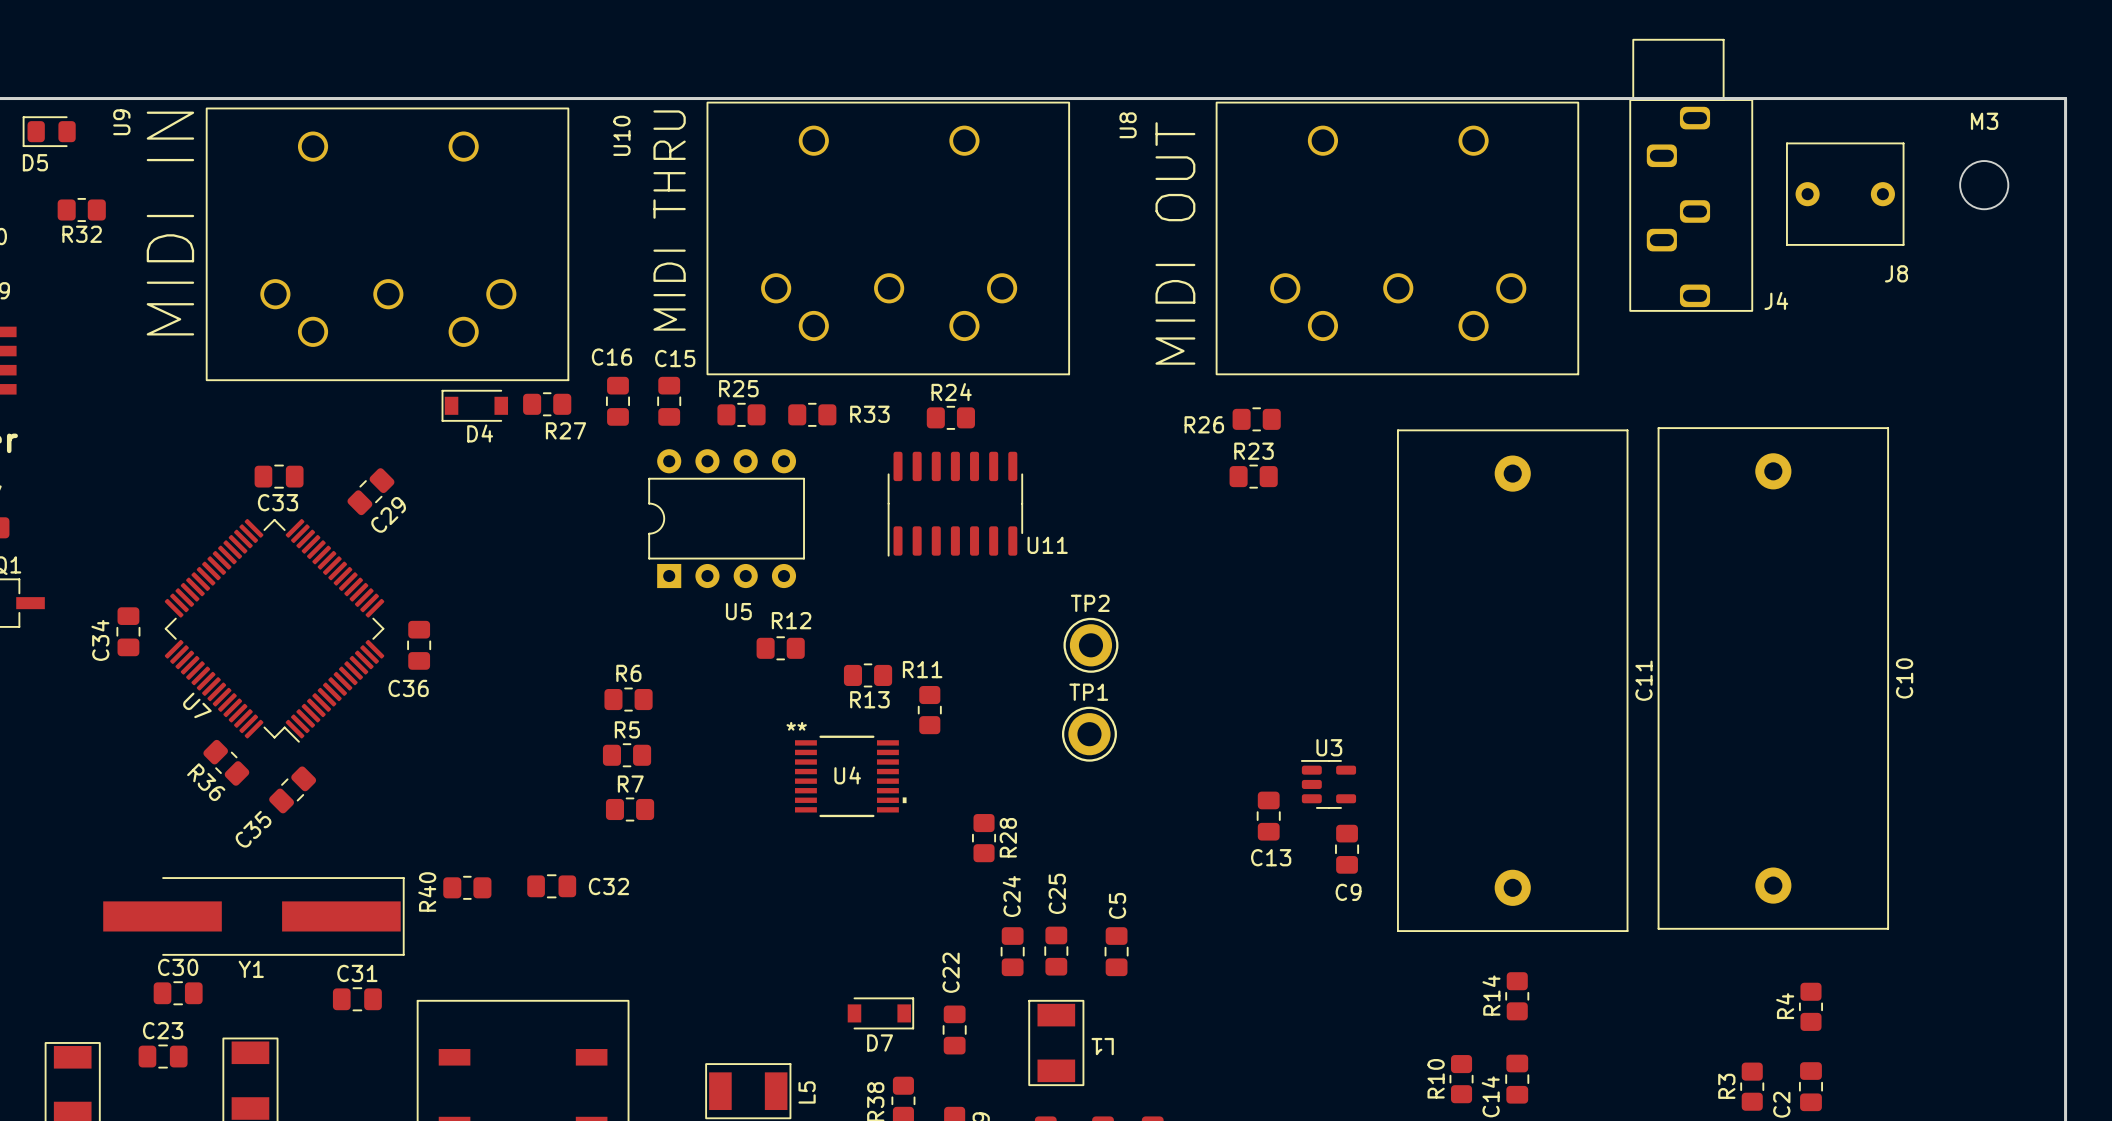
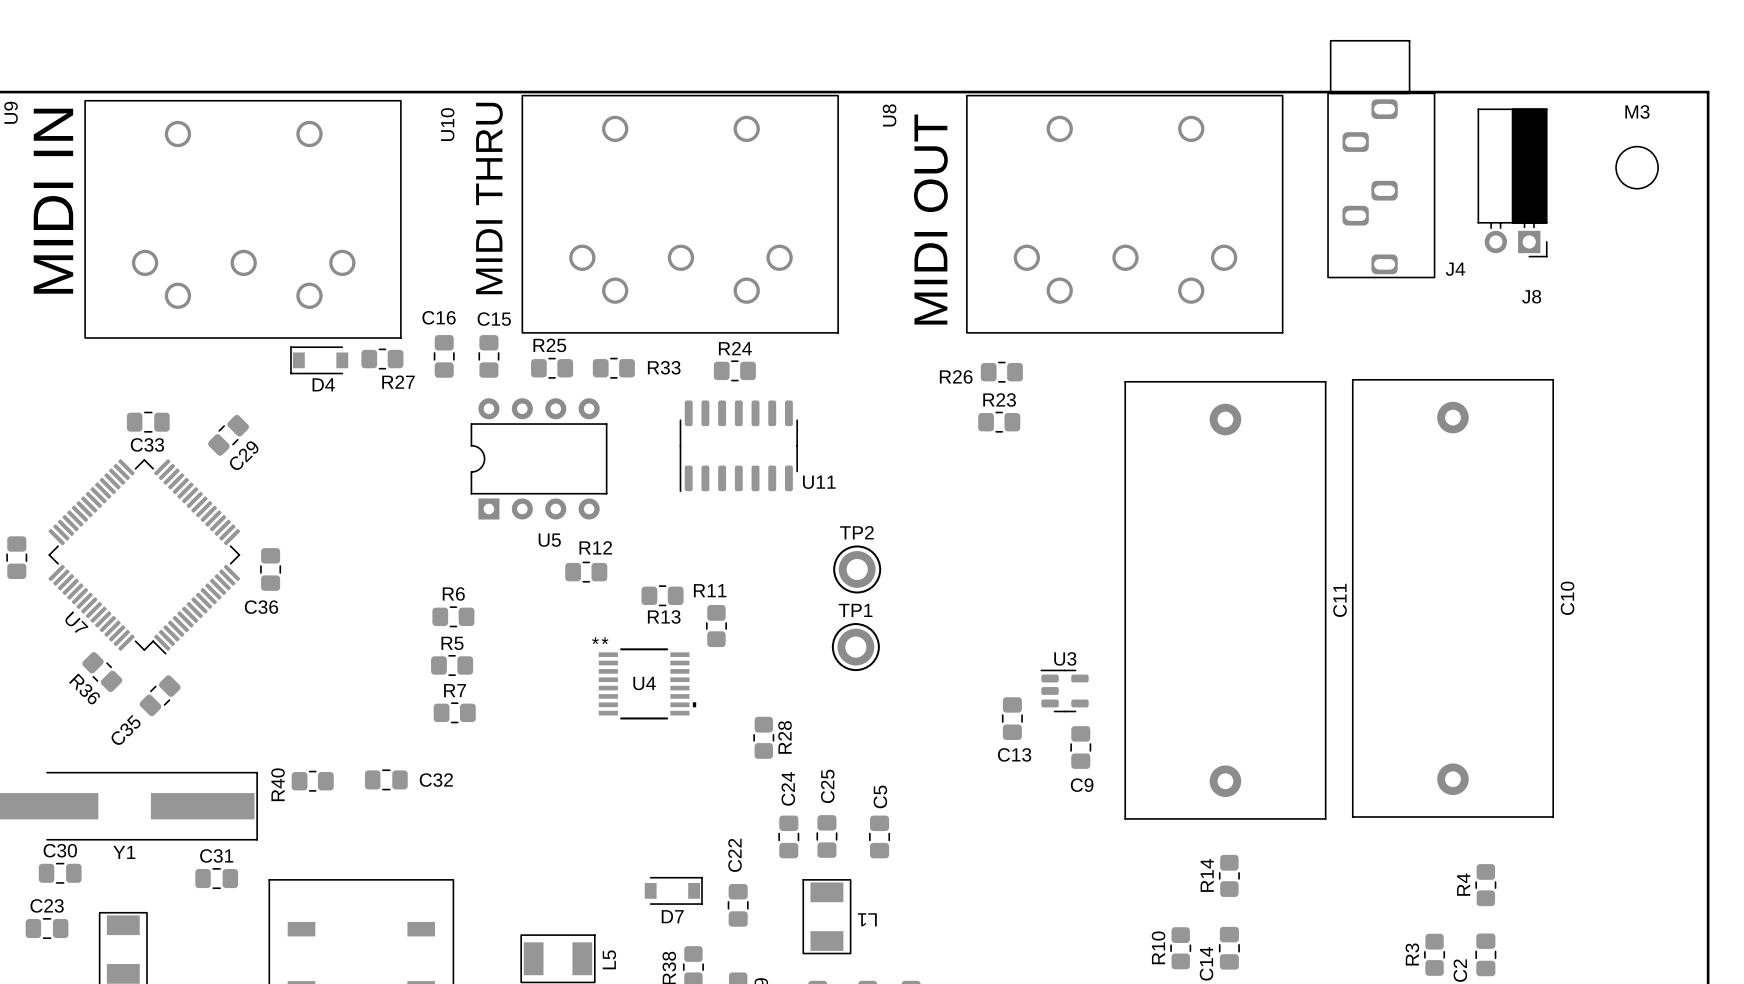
J8 footprint: [1786, 142, 1905, 246] -> [1477, 108, 1548, 258]
J8 name position: J8 (1896, 273) -> J8 (1531, 296)

